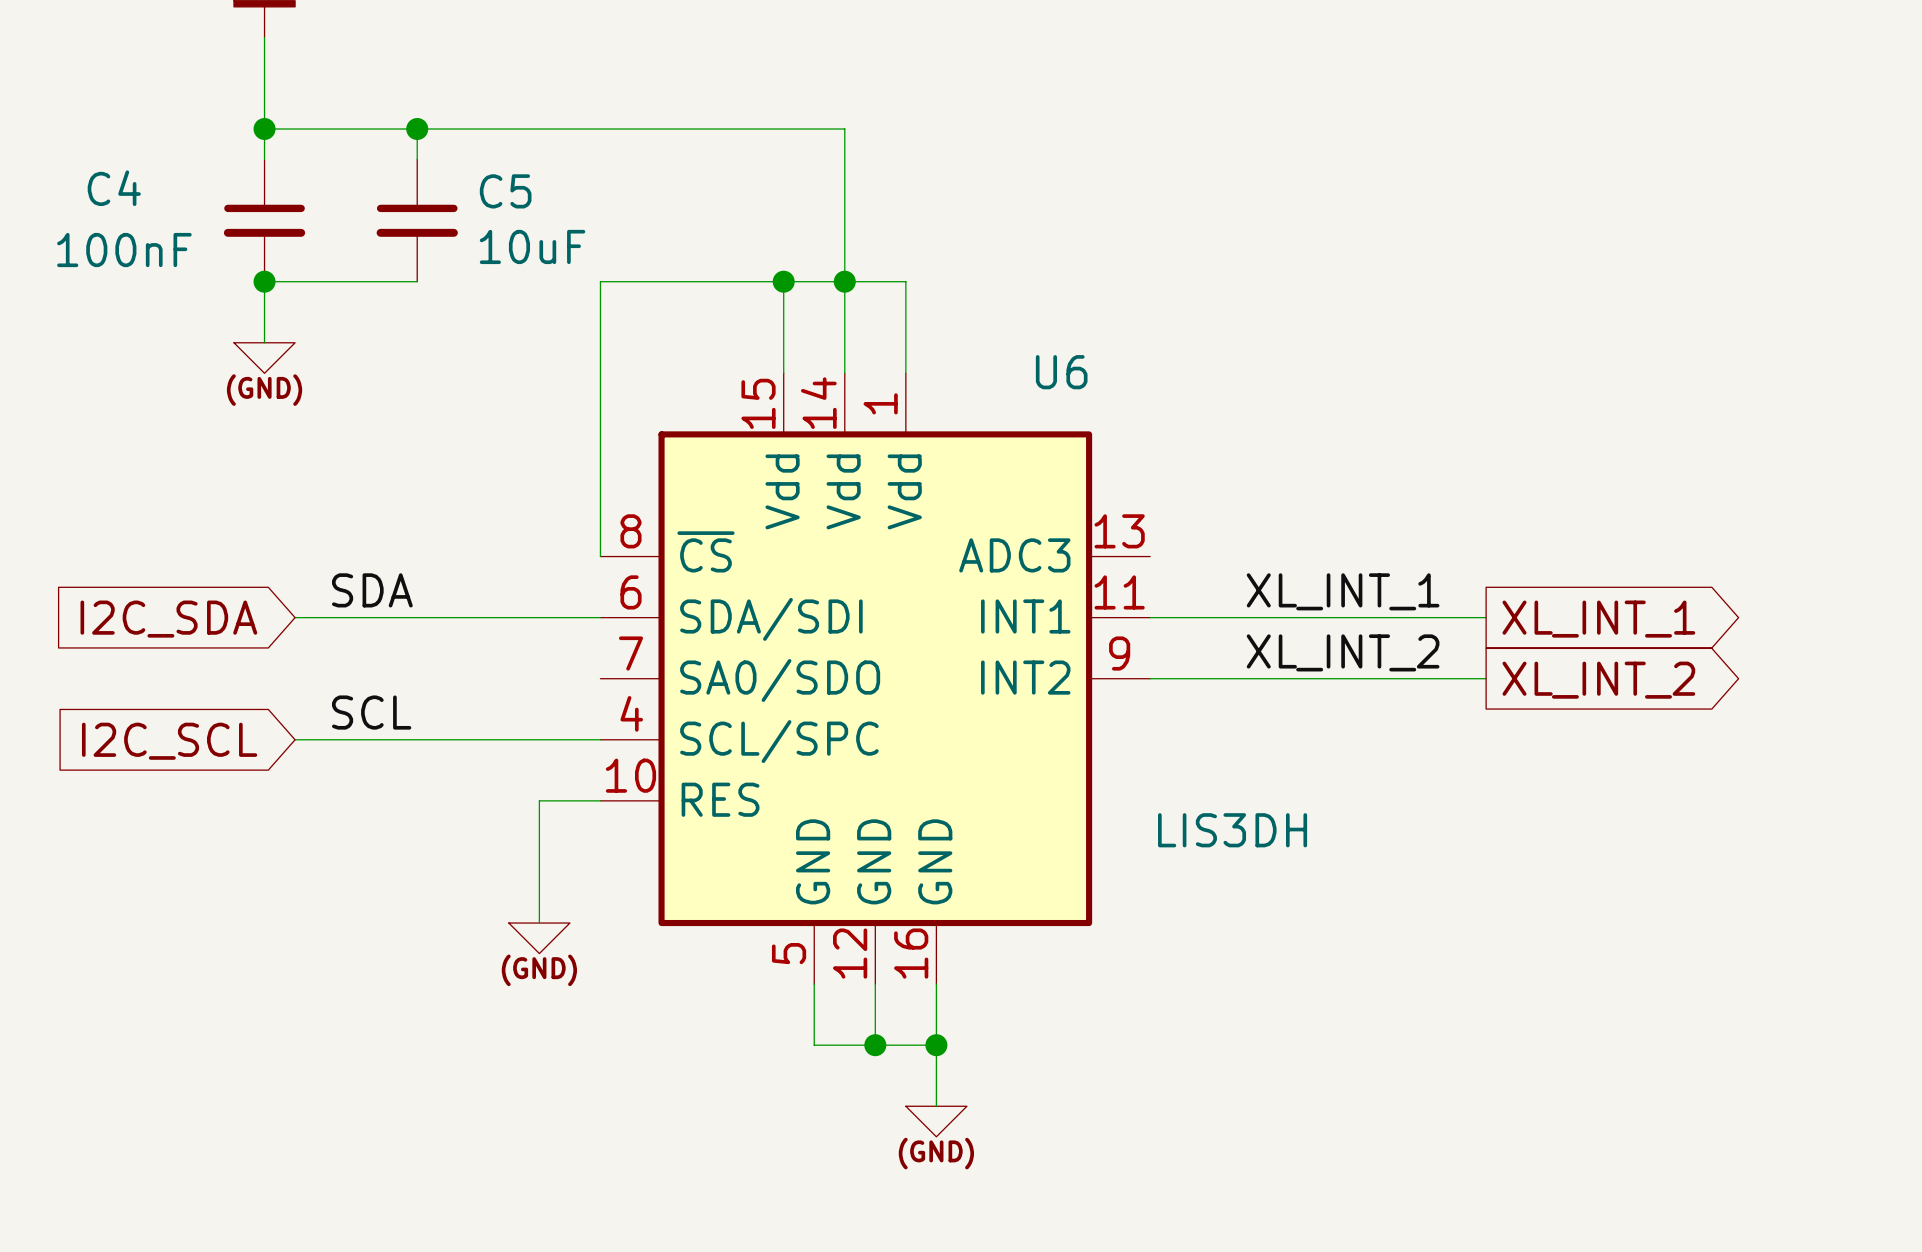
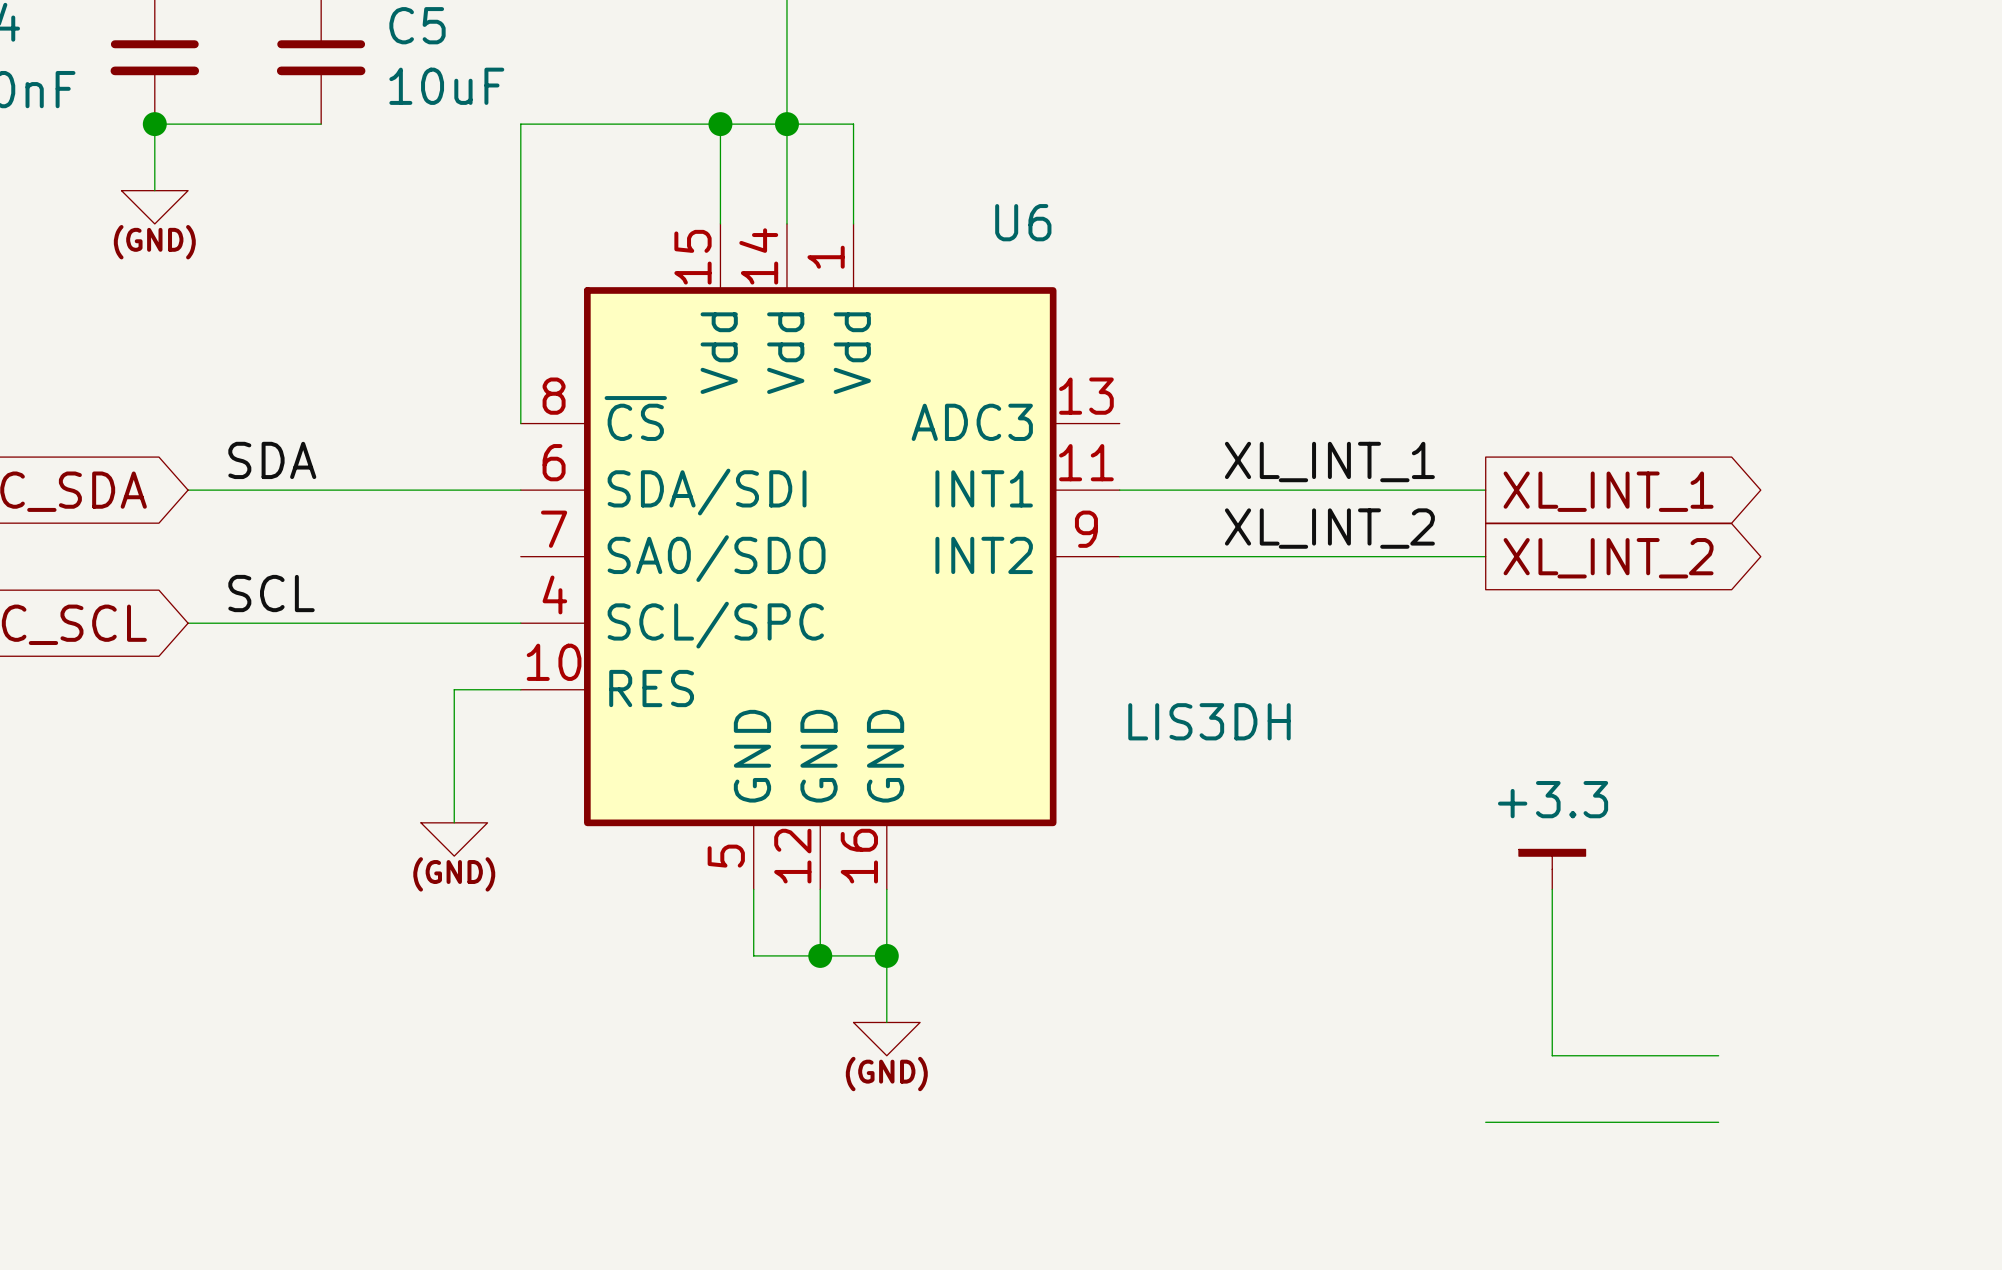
power symbol: none -> +3.3 (1552, 869)
wire: none -> (1552, 889) (1552, 1055) (1718, 1055)
wire: none -> (1485, 1122) (1718, 1122)

